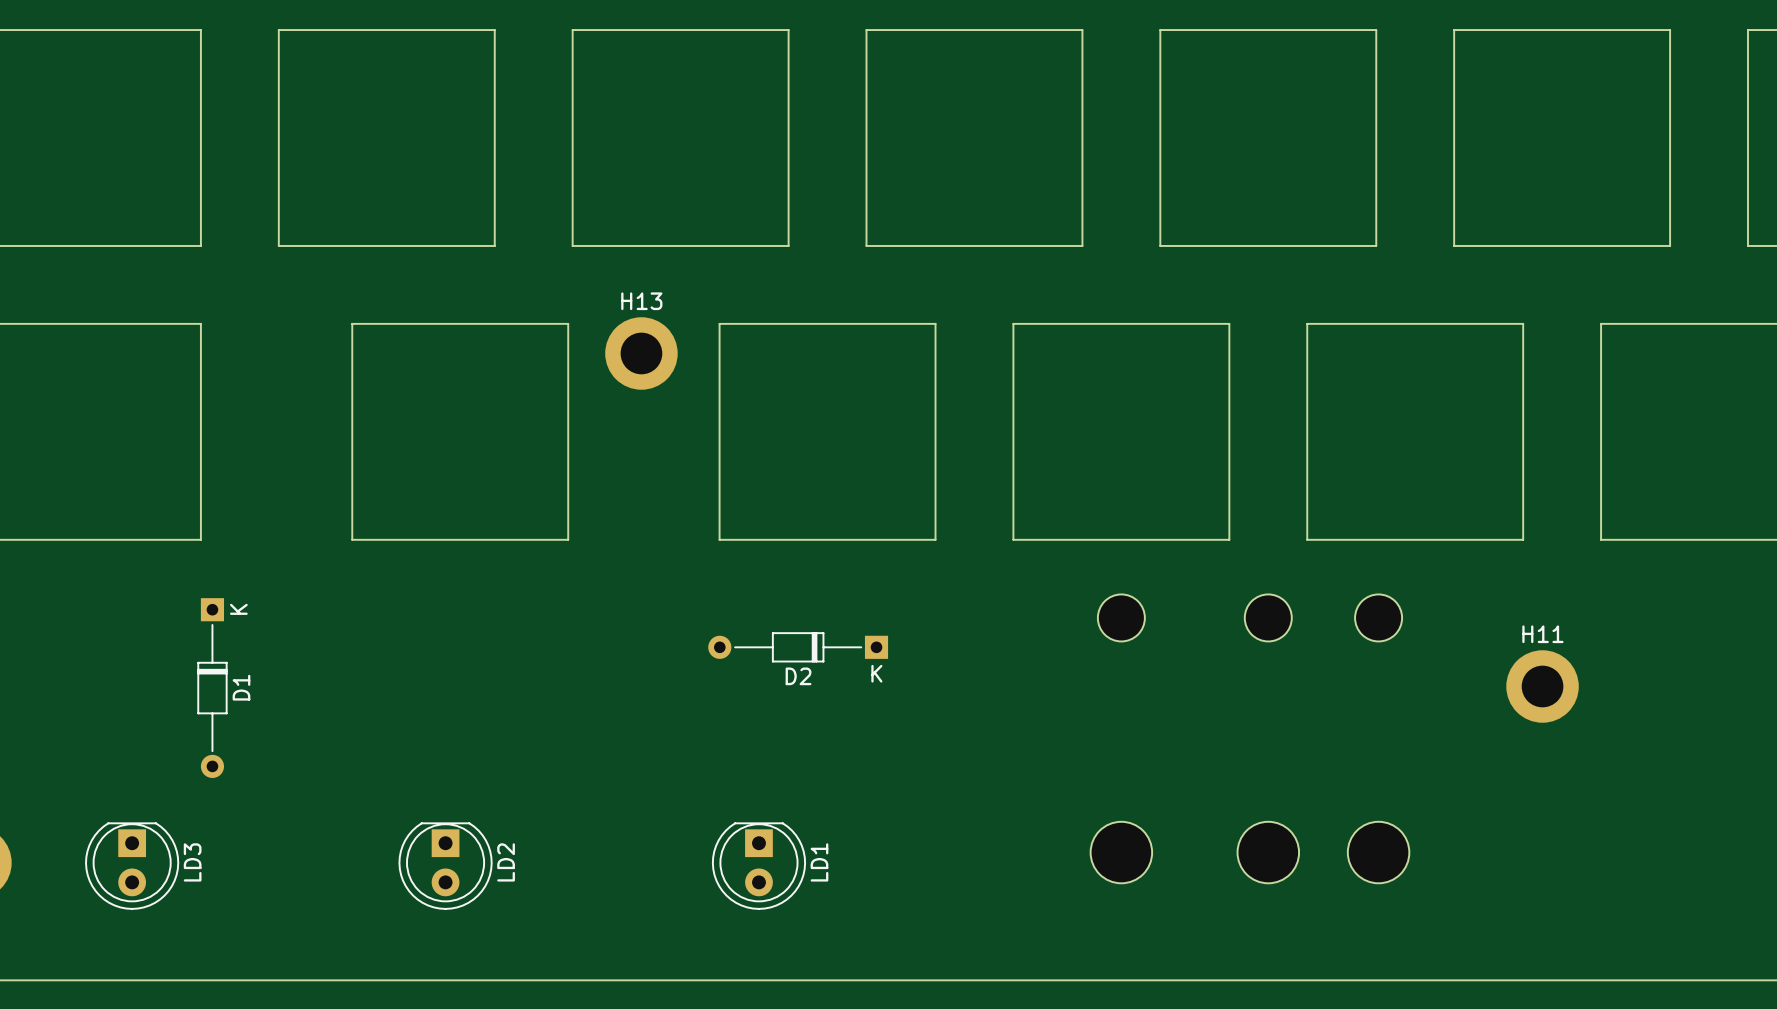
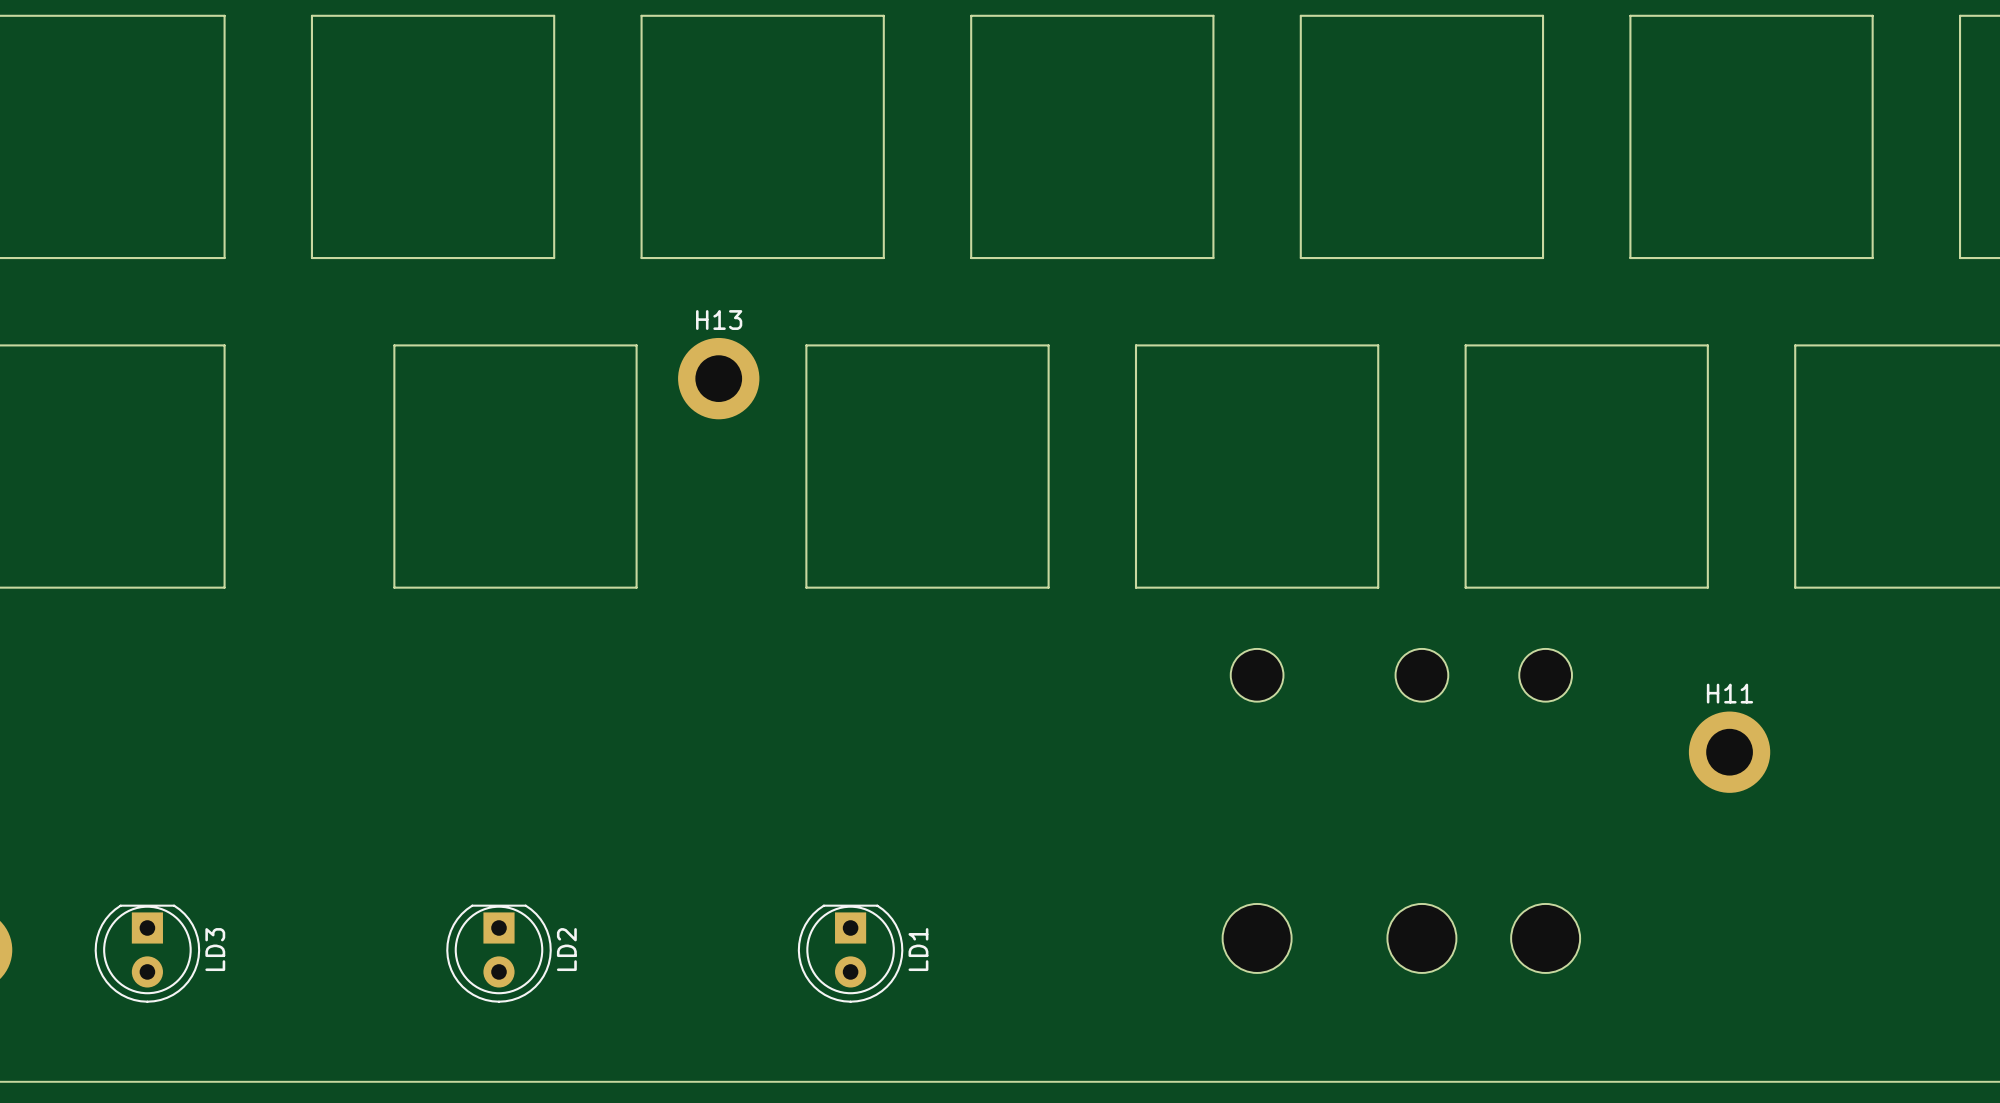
D2: (798, 647) -> none
D1: (212, 688) -> none

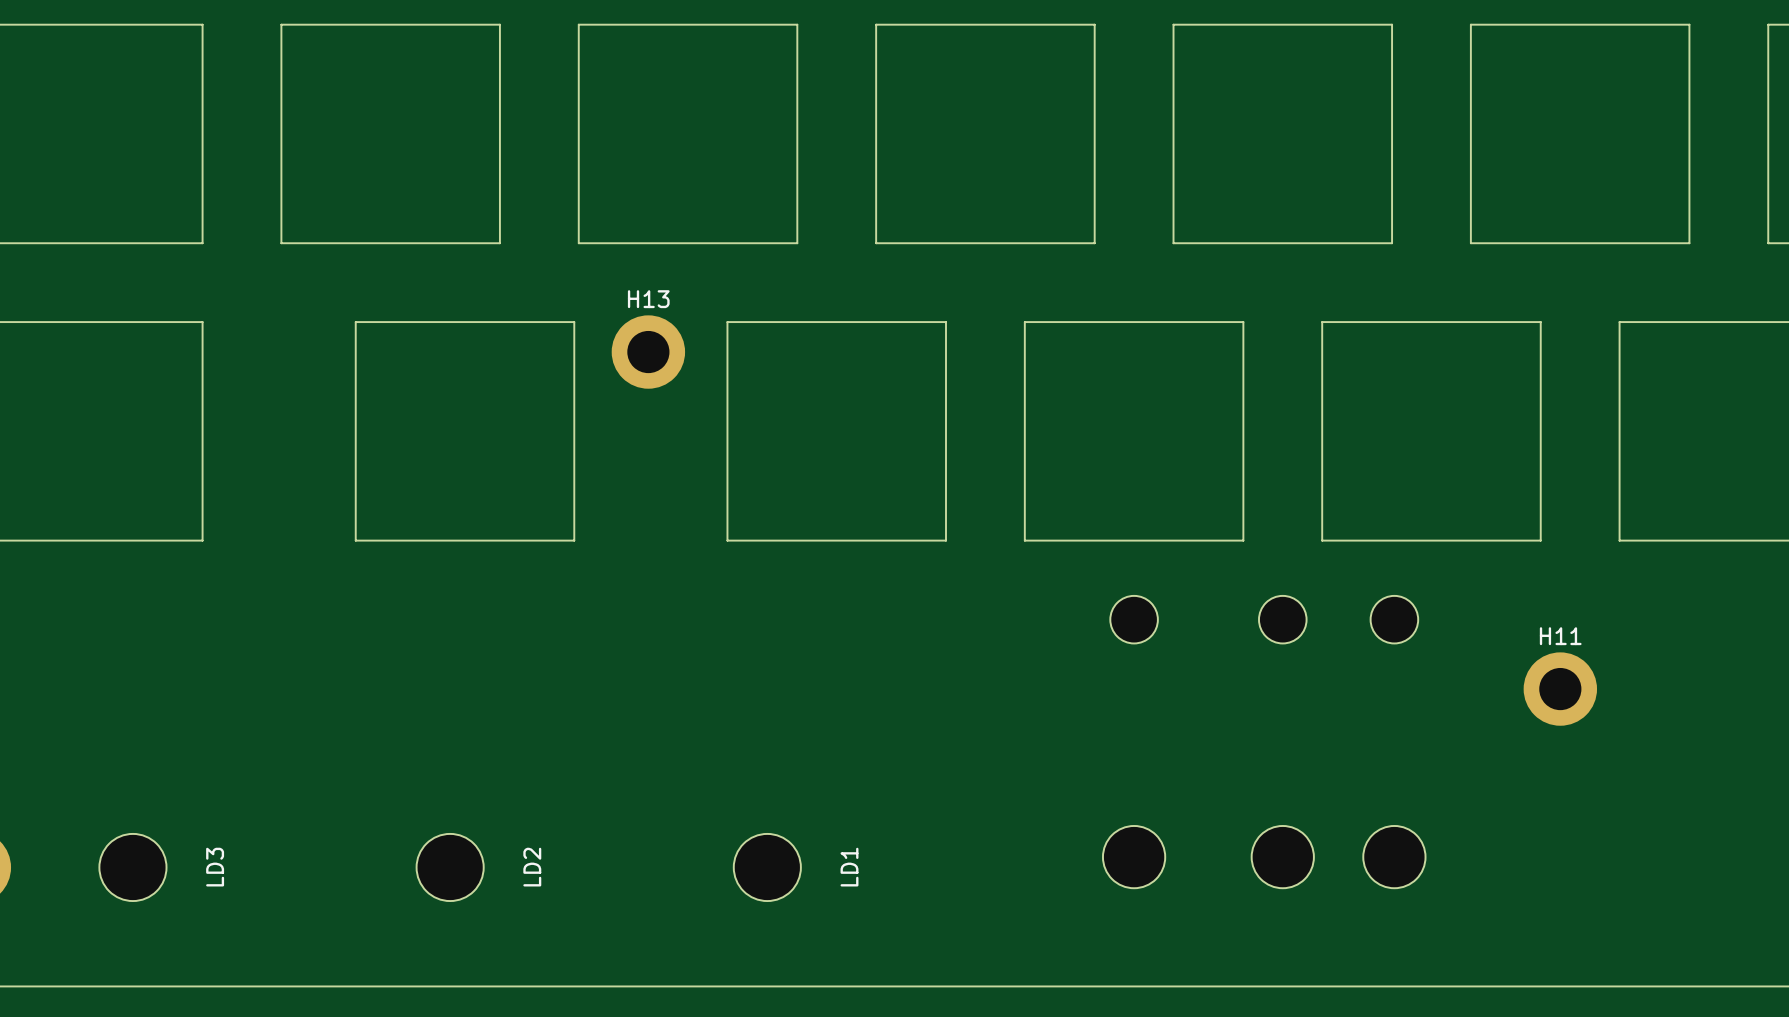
LD3 footprint: [94, 904, 201, 1003] -> [99, 833, 167, 902]
LD2 footprint: [446, 904, 552, 1003] -> [416, 833, 484, 902]
LD1 footprint: [797, 904, 904, 1003] -> [733, 833, 801, 902]

